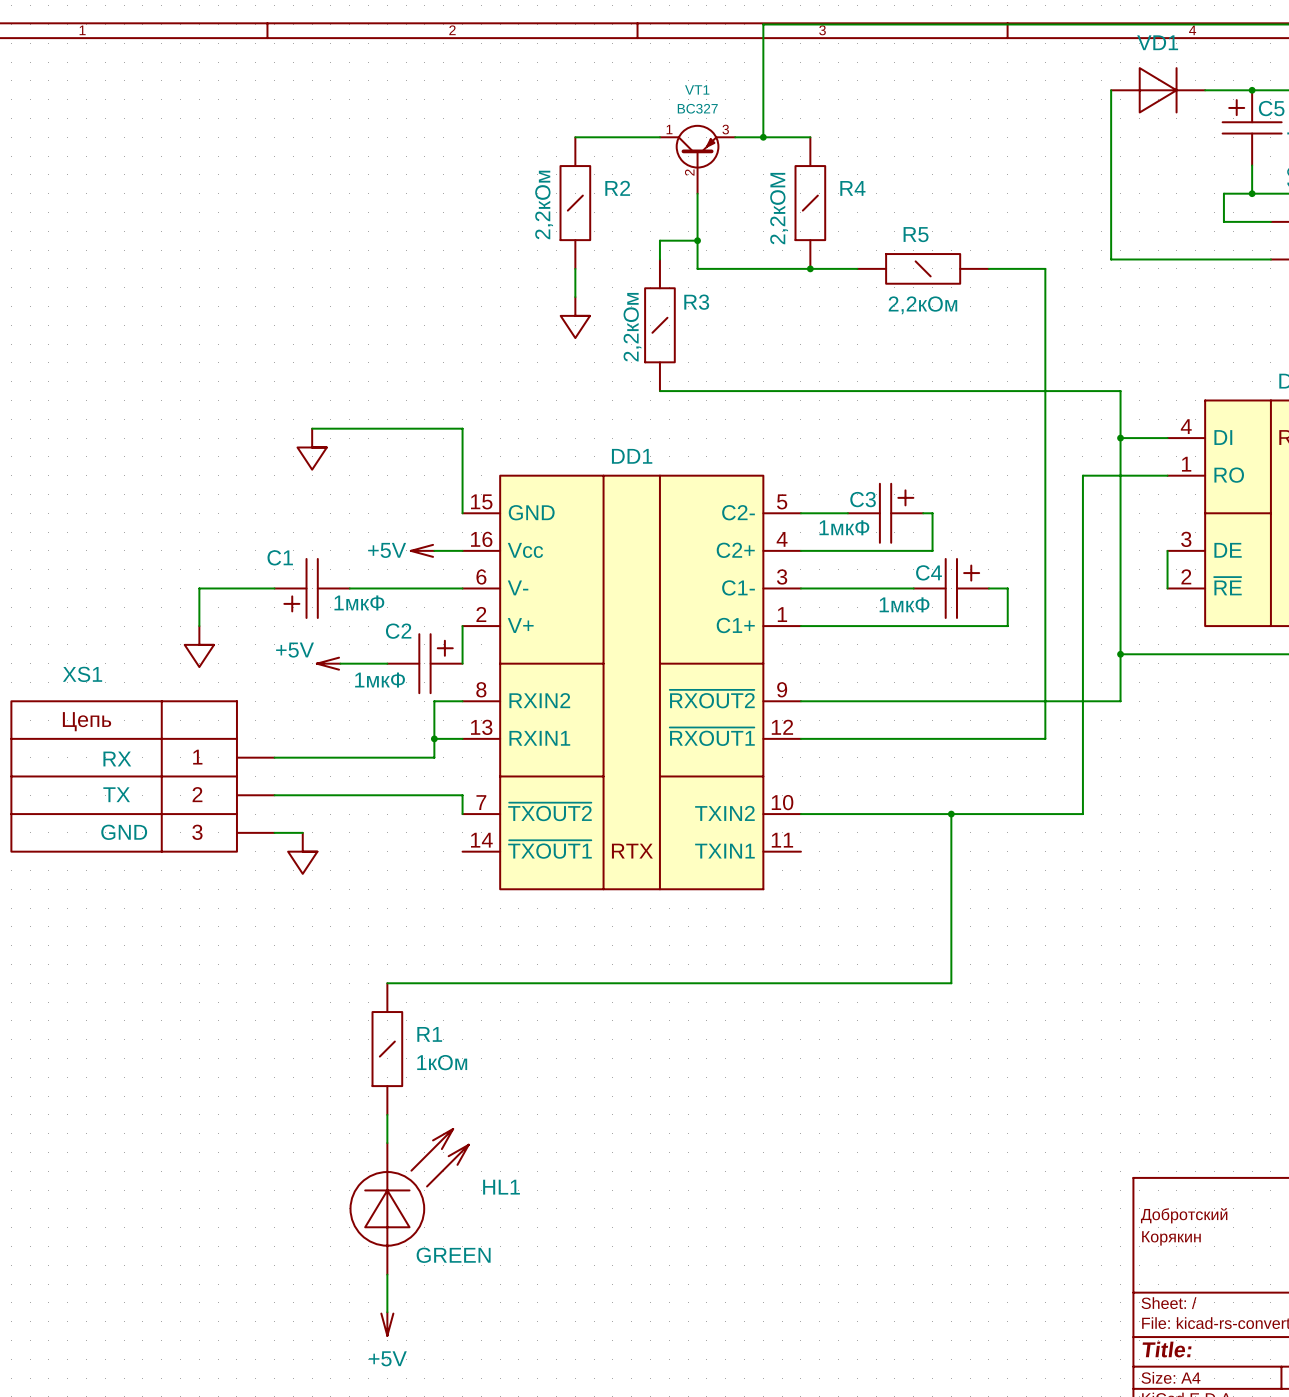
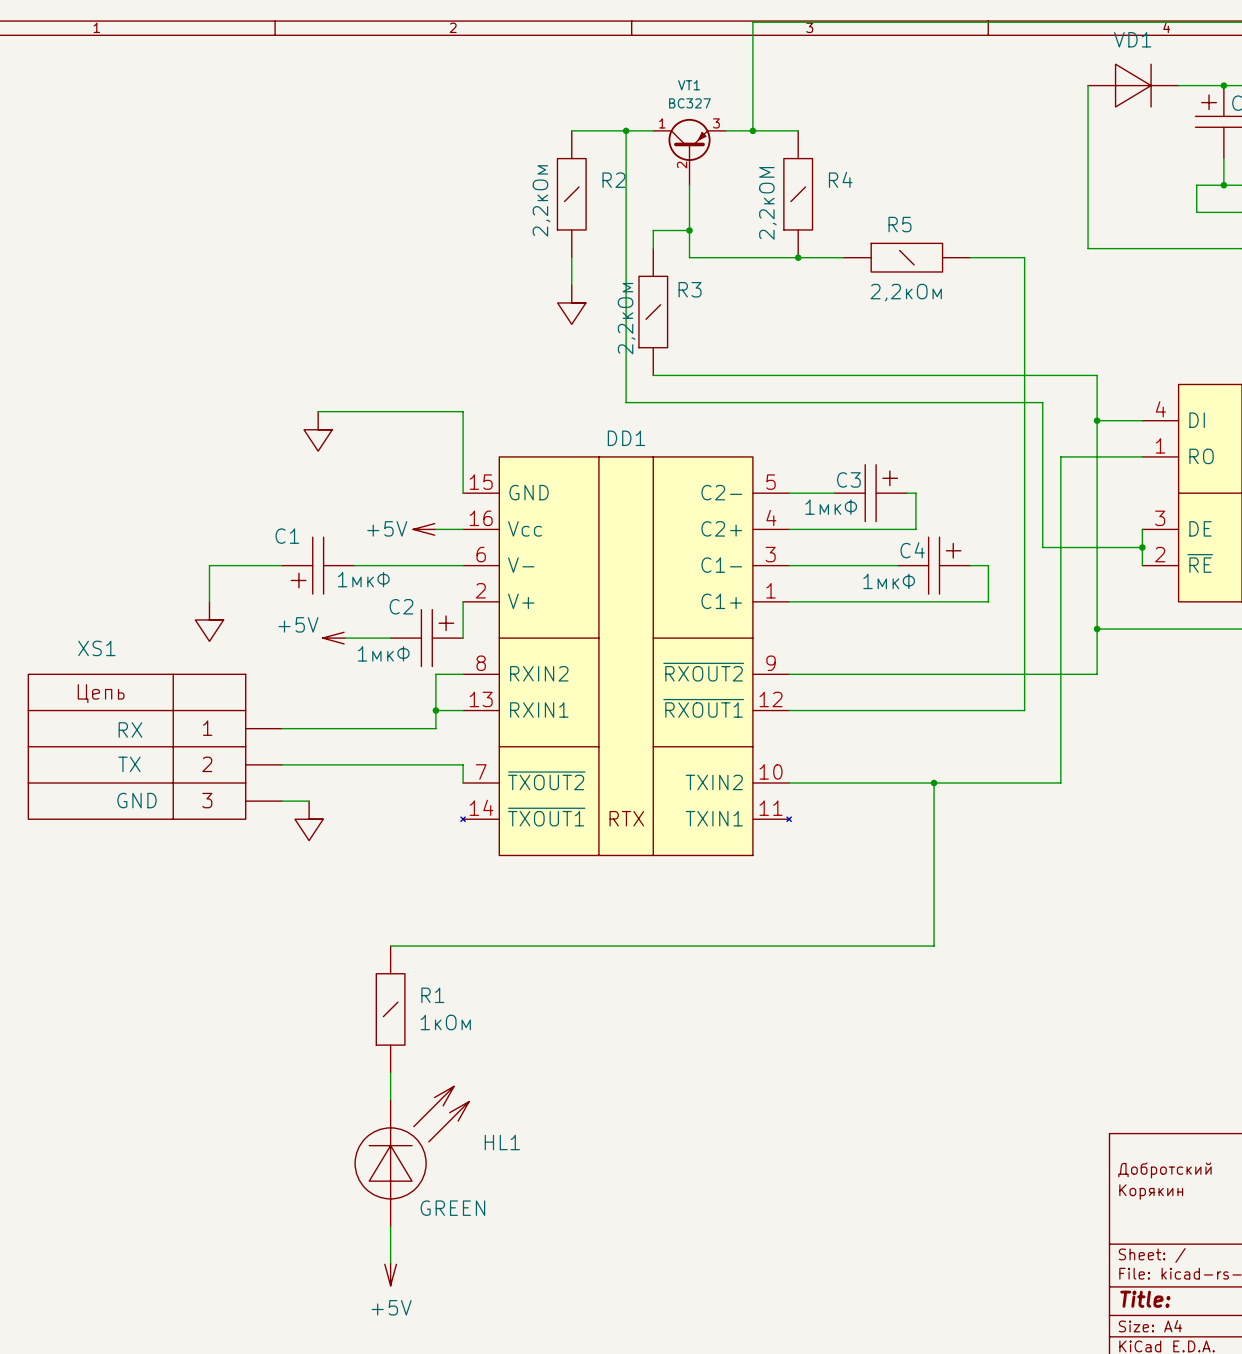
wire: none -> (626, 130) (626, 402) (1042, 402) (1042, 547) (1142, 547)
junction: none -> (626, 130)
DD1 symbol: [462, 475, 801, 890] -> [460, 456, 792, 856]
junction: none -> (1142, 547)

